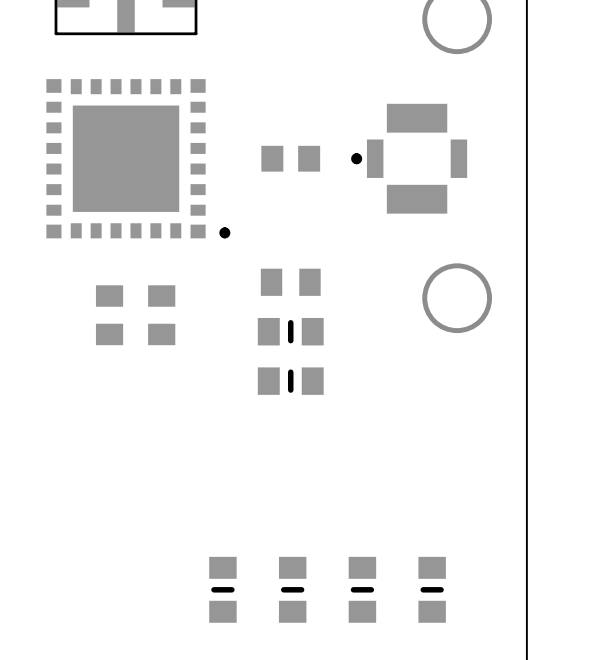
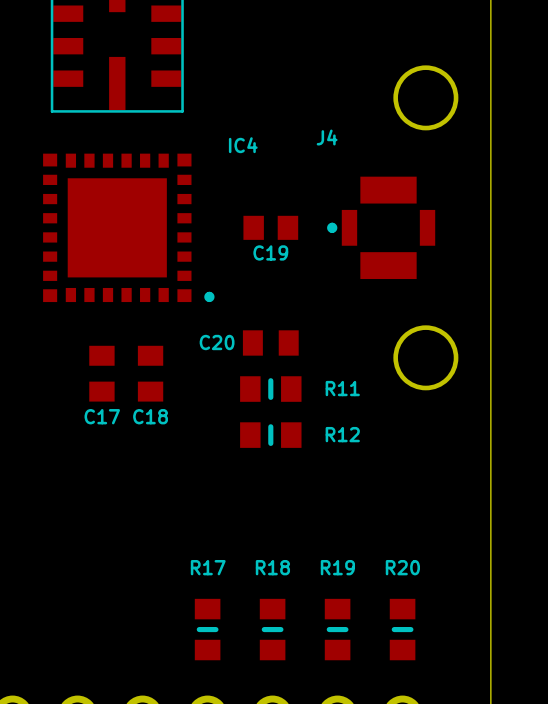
text: none -> J4 (327, 137)
text: none -> IC4 (243, 145)
text: none -> C19 (270, 252)
text: none -> C20 (217, 342)
text: none -> R11 (342, 388)
text: none -> C17 (102, 416)
text: none -> C18 (150, 416)
text: none -> R12 (342, 434)
text: none -> R17 (208, 567)
text: none -> R18 (272, 567)
text: none -> R19 (337, 567)
text: none -> R20 (402, 567)

